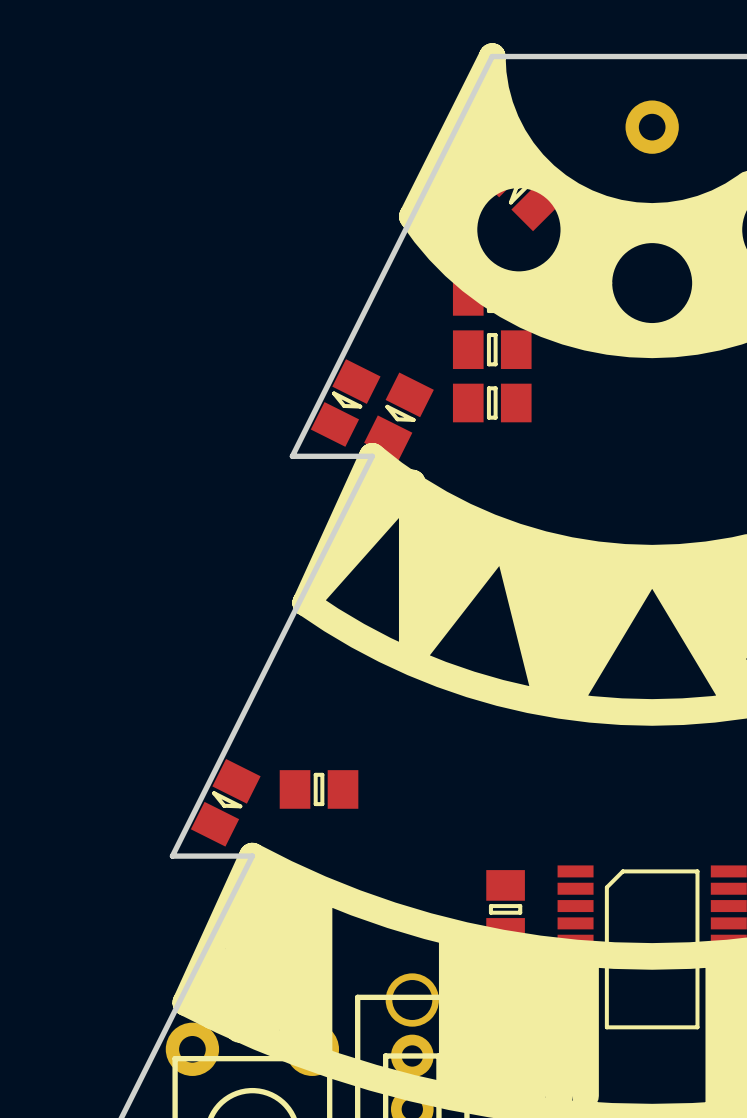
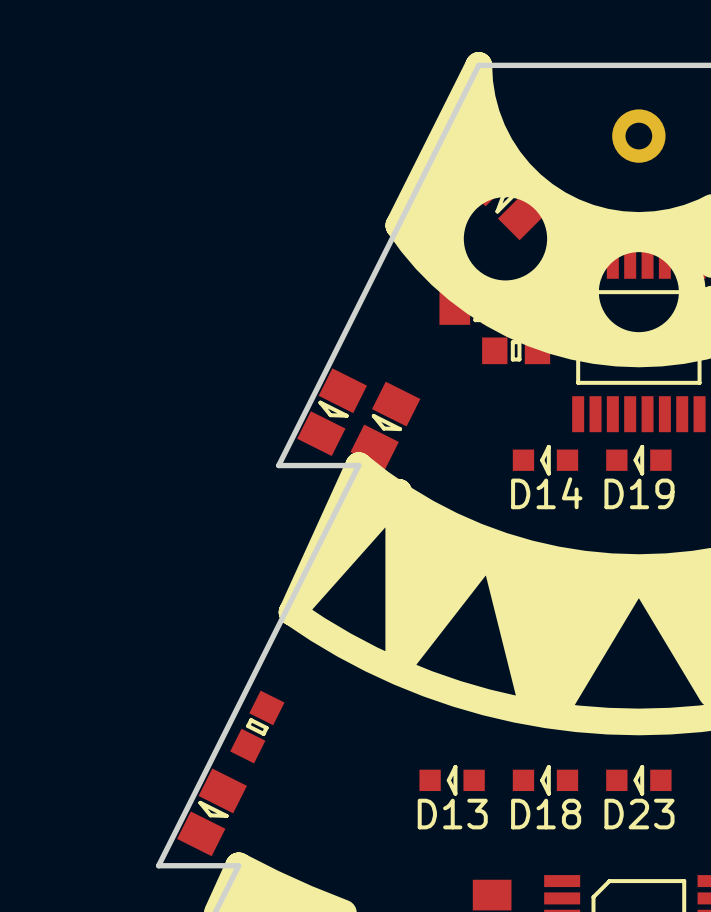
part: none -> (638, 337)
part: none -> (516, 350)
part: (492, 349) -> none
part: (492, 403) -> none
D14: none -> (545, 460)
D19: none -> (638, 460)
part: none -> (257, 727)
D13: none -> (452, 780)
D18: none -> (545, 780)
D23: none -> (638, 780)
part: (319, 789) -> none

